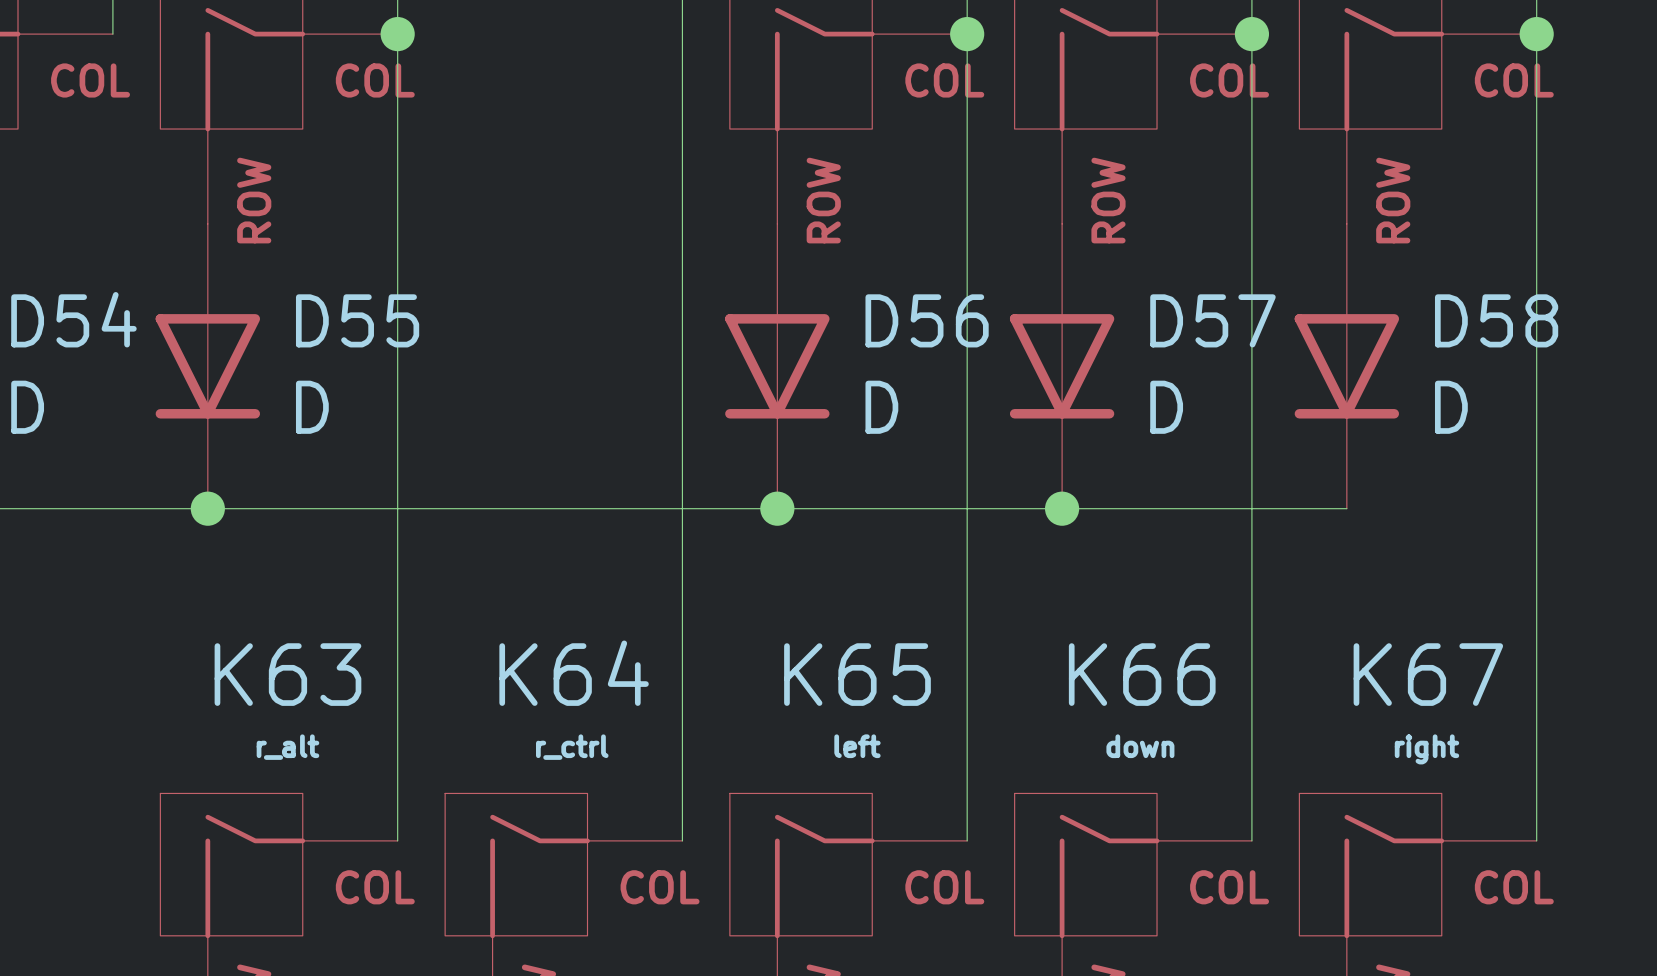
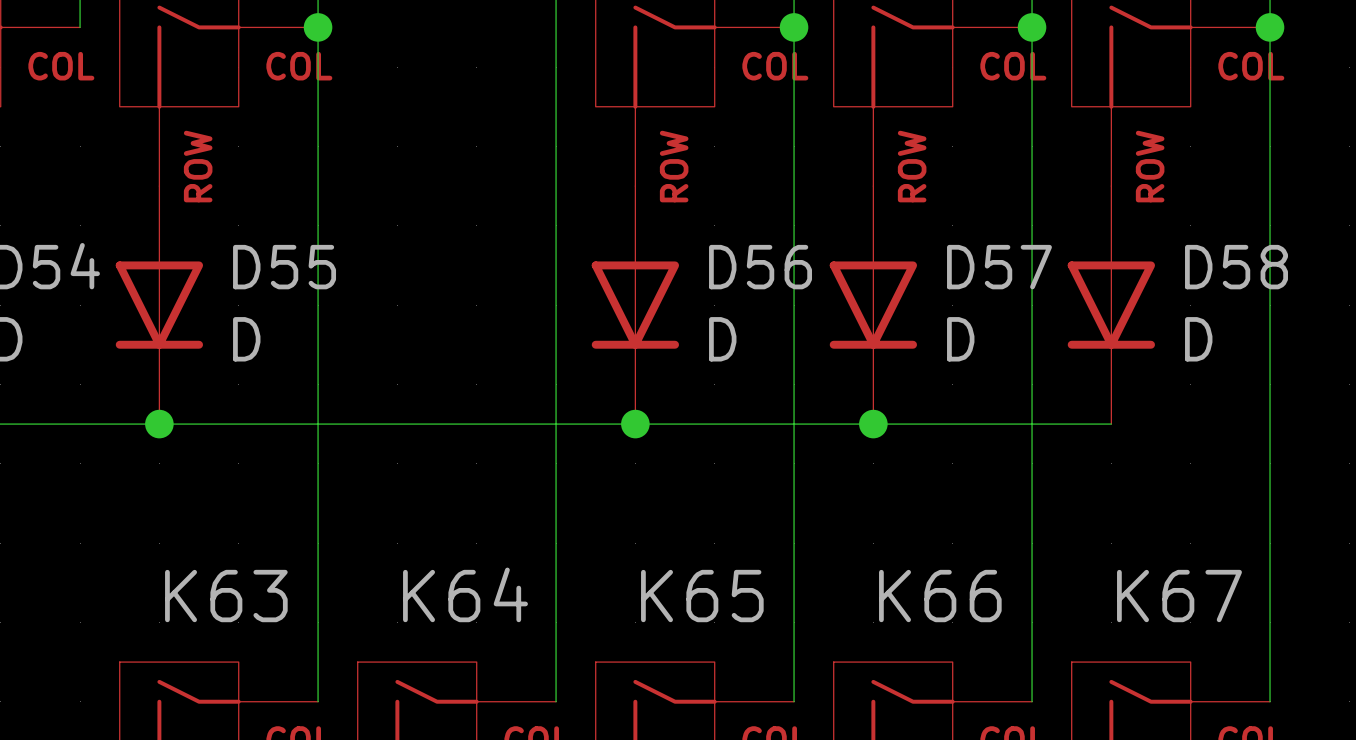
K64 name position: K64 (574, 673) -> K64 (465, 594)
K63 name position: K63 (287, 674) -> K63 (226, 596)
K65 name position: K65 (857, 674) -> K65 (702, 596)
K66 name position: K66 (1142, 674) -> K66 (940, 596)
K67 name position: K67 (1428, 674) -> K67 (1179, 596)
K65 value: left (857, 746) -> none
K66 value: down (1140, 746) -> none
K63 value: r_alt (287, 747) -> none
K64 value: r_ctrl (572, 747) -> none
K67 value: right (1426, 749) -> none

